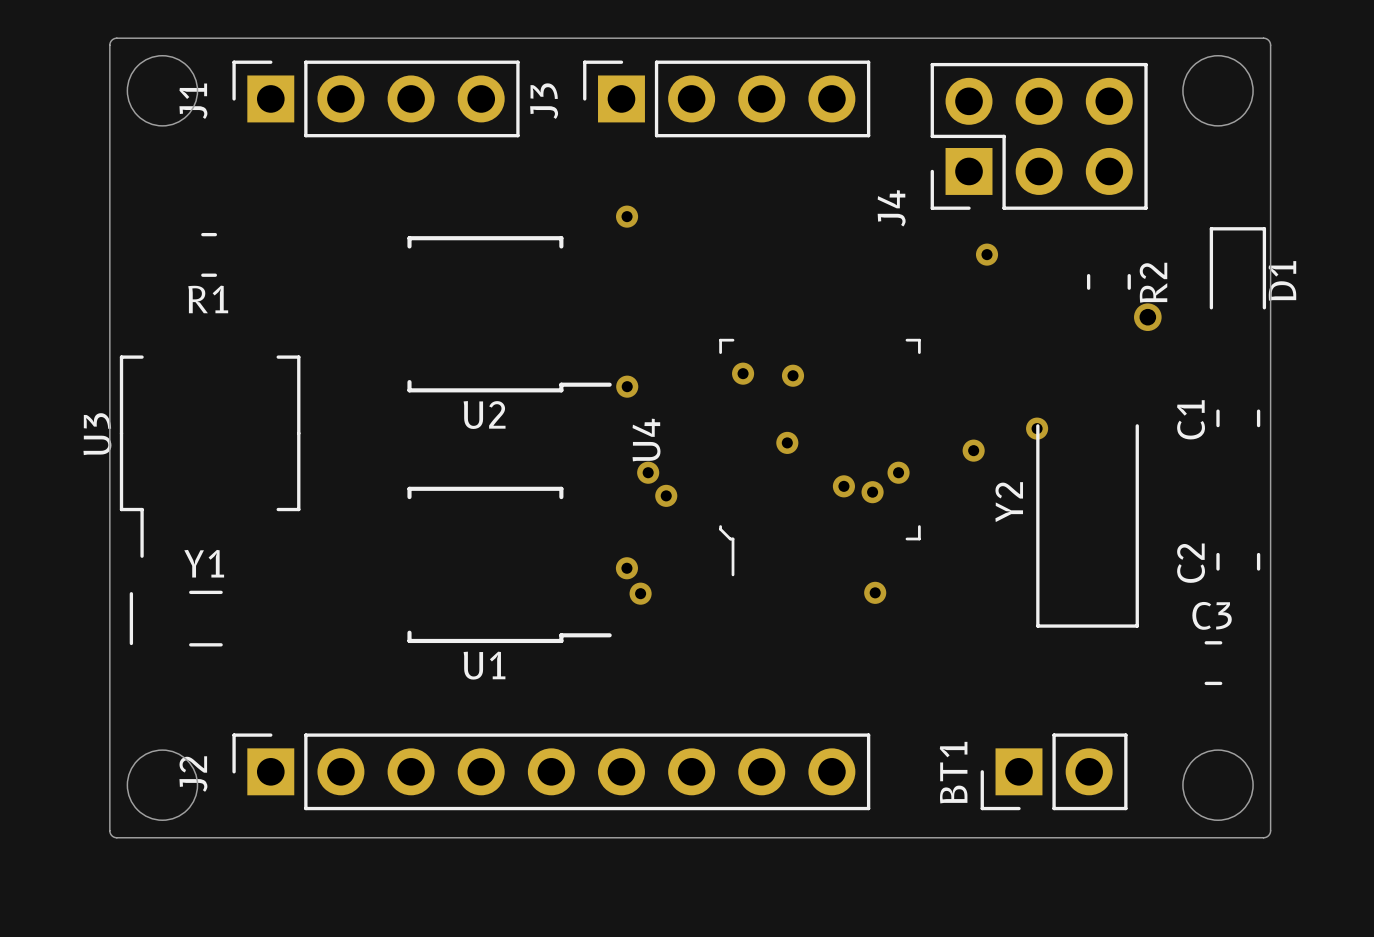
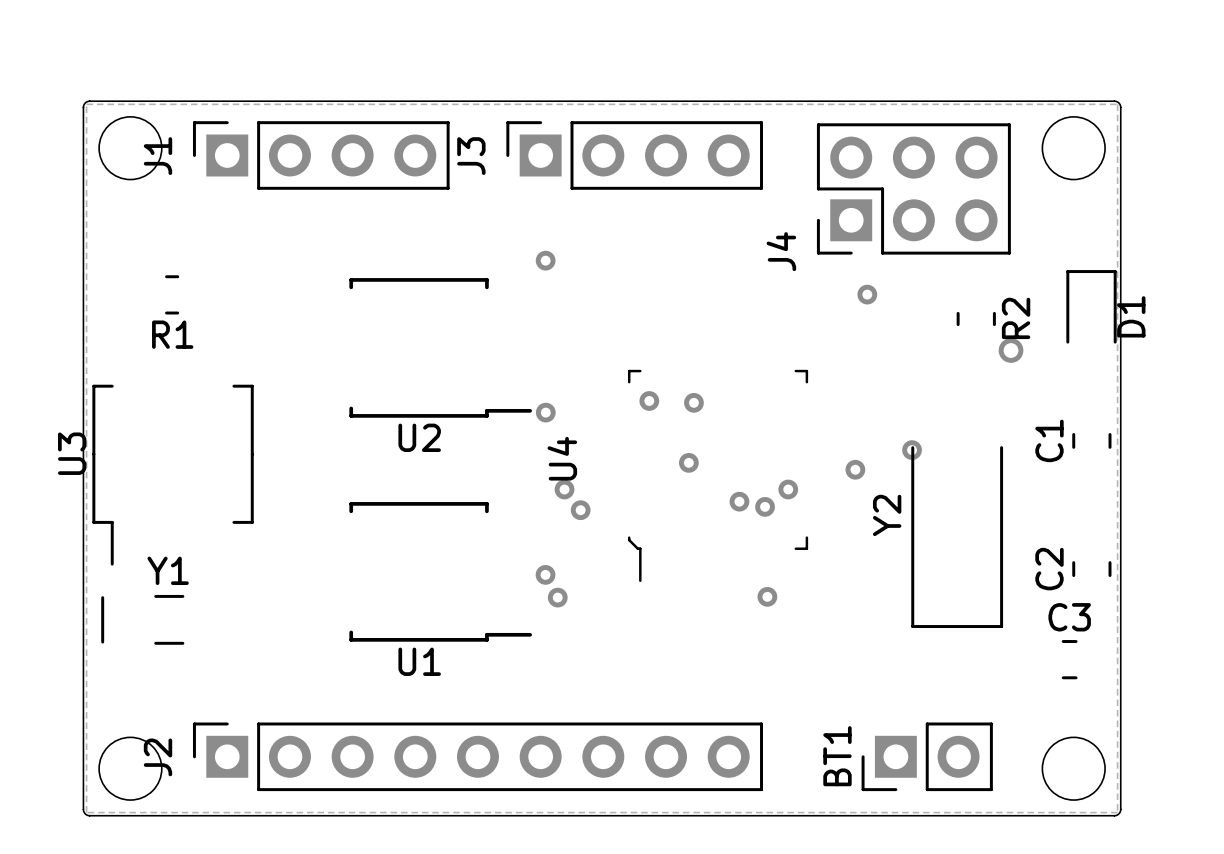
zone outline: none -> (86, 104) (86, 812) (1117, 812) (1117, 104) (86, 104)

